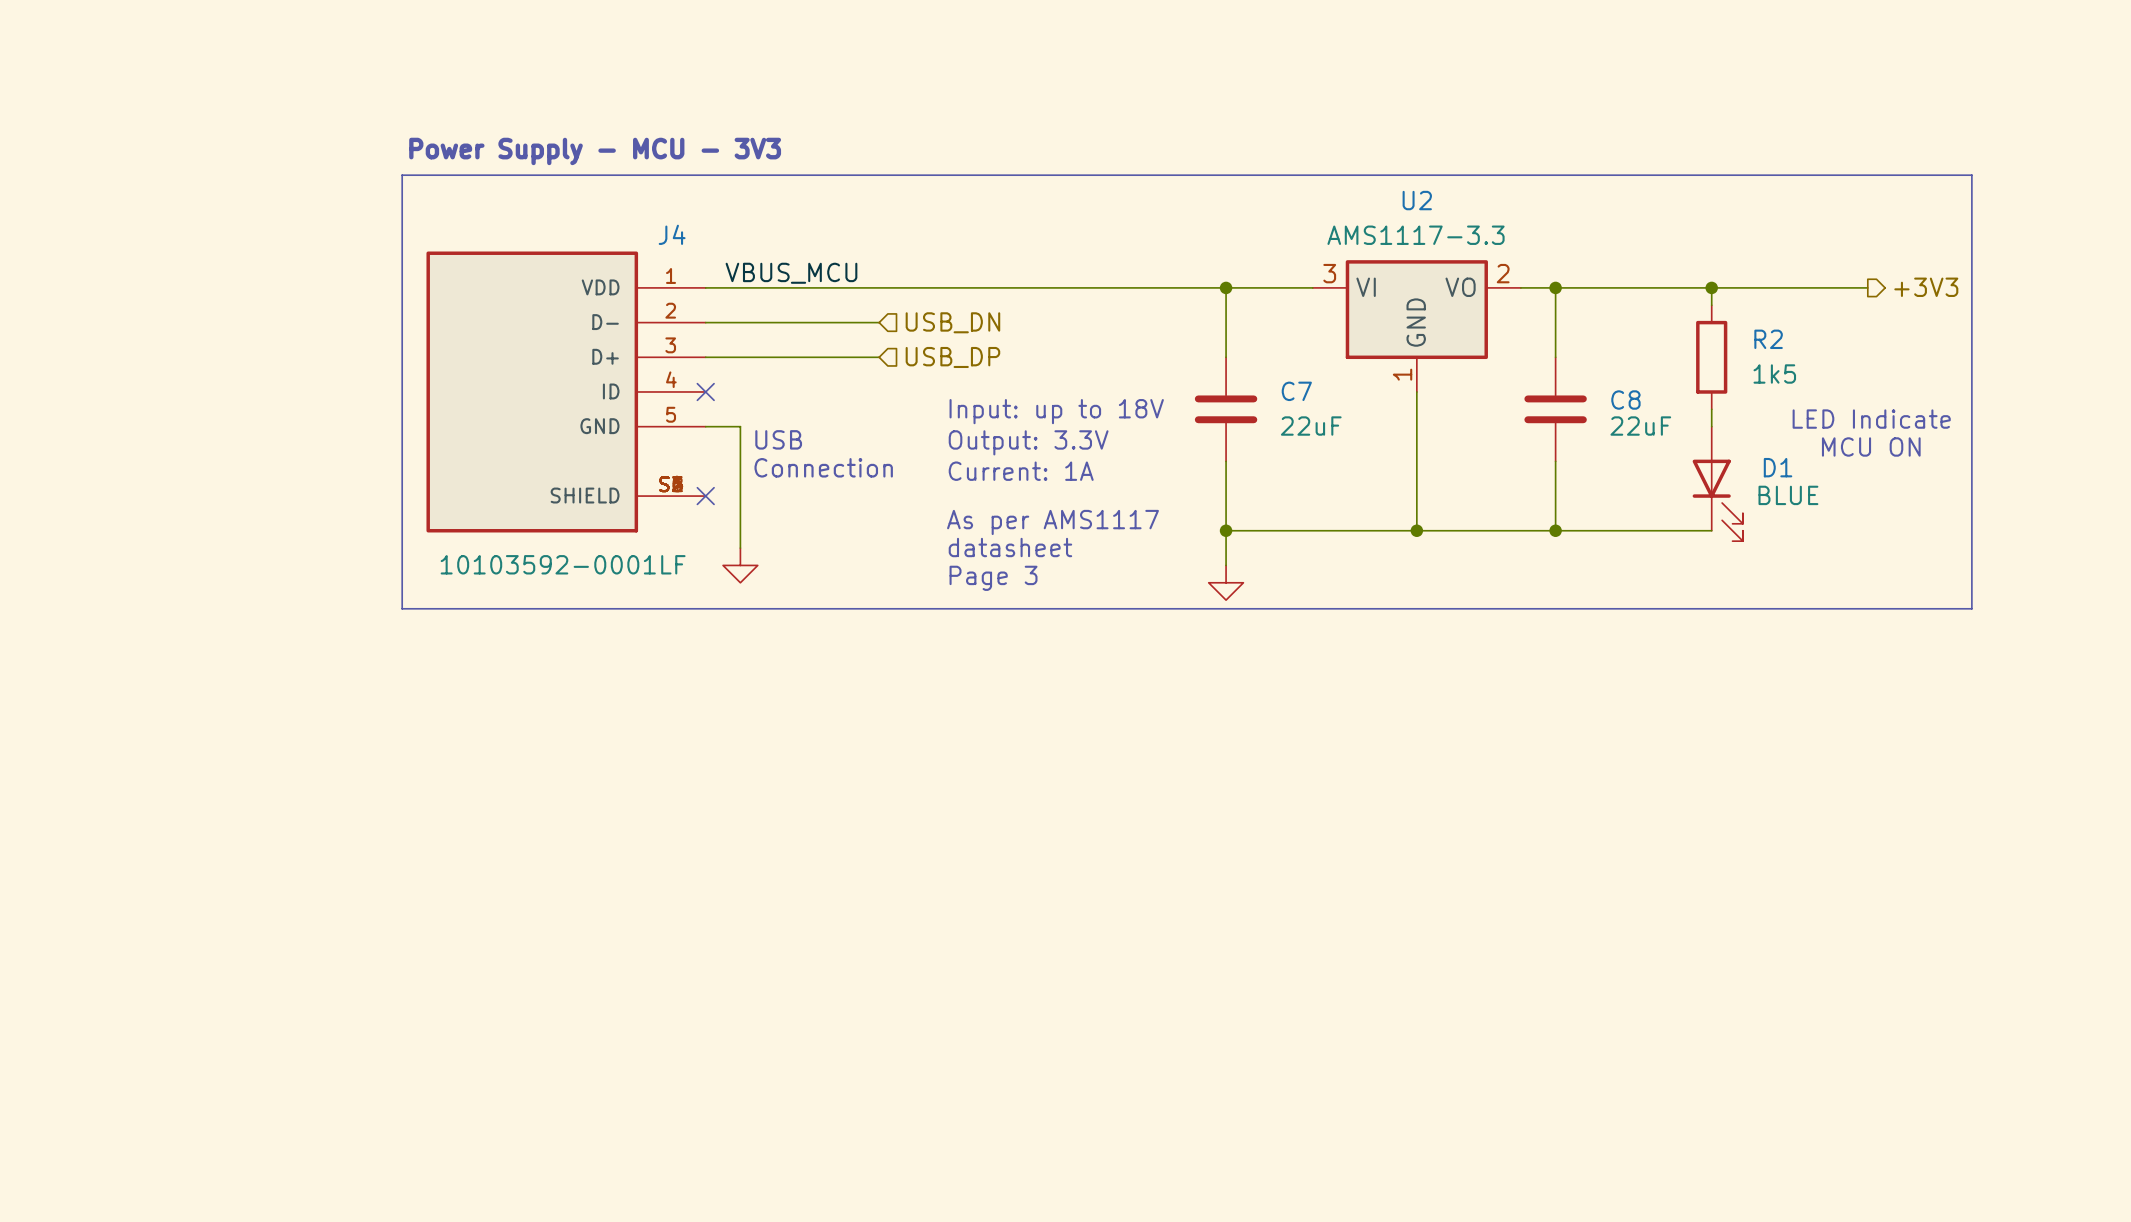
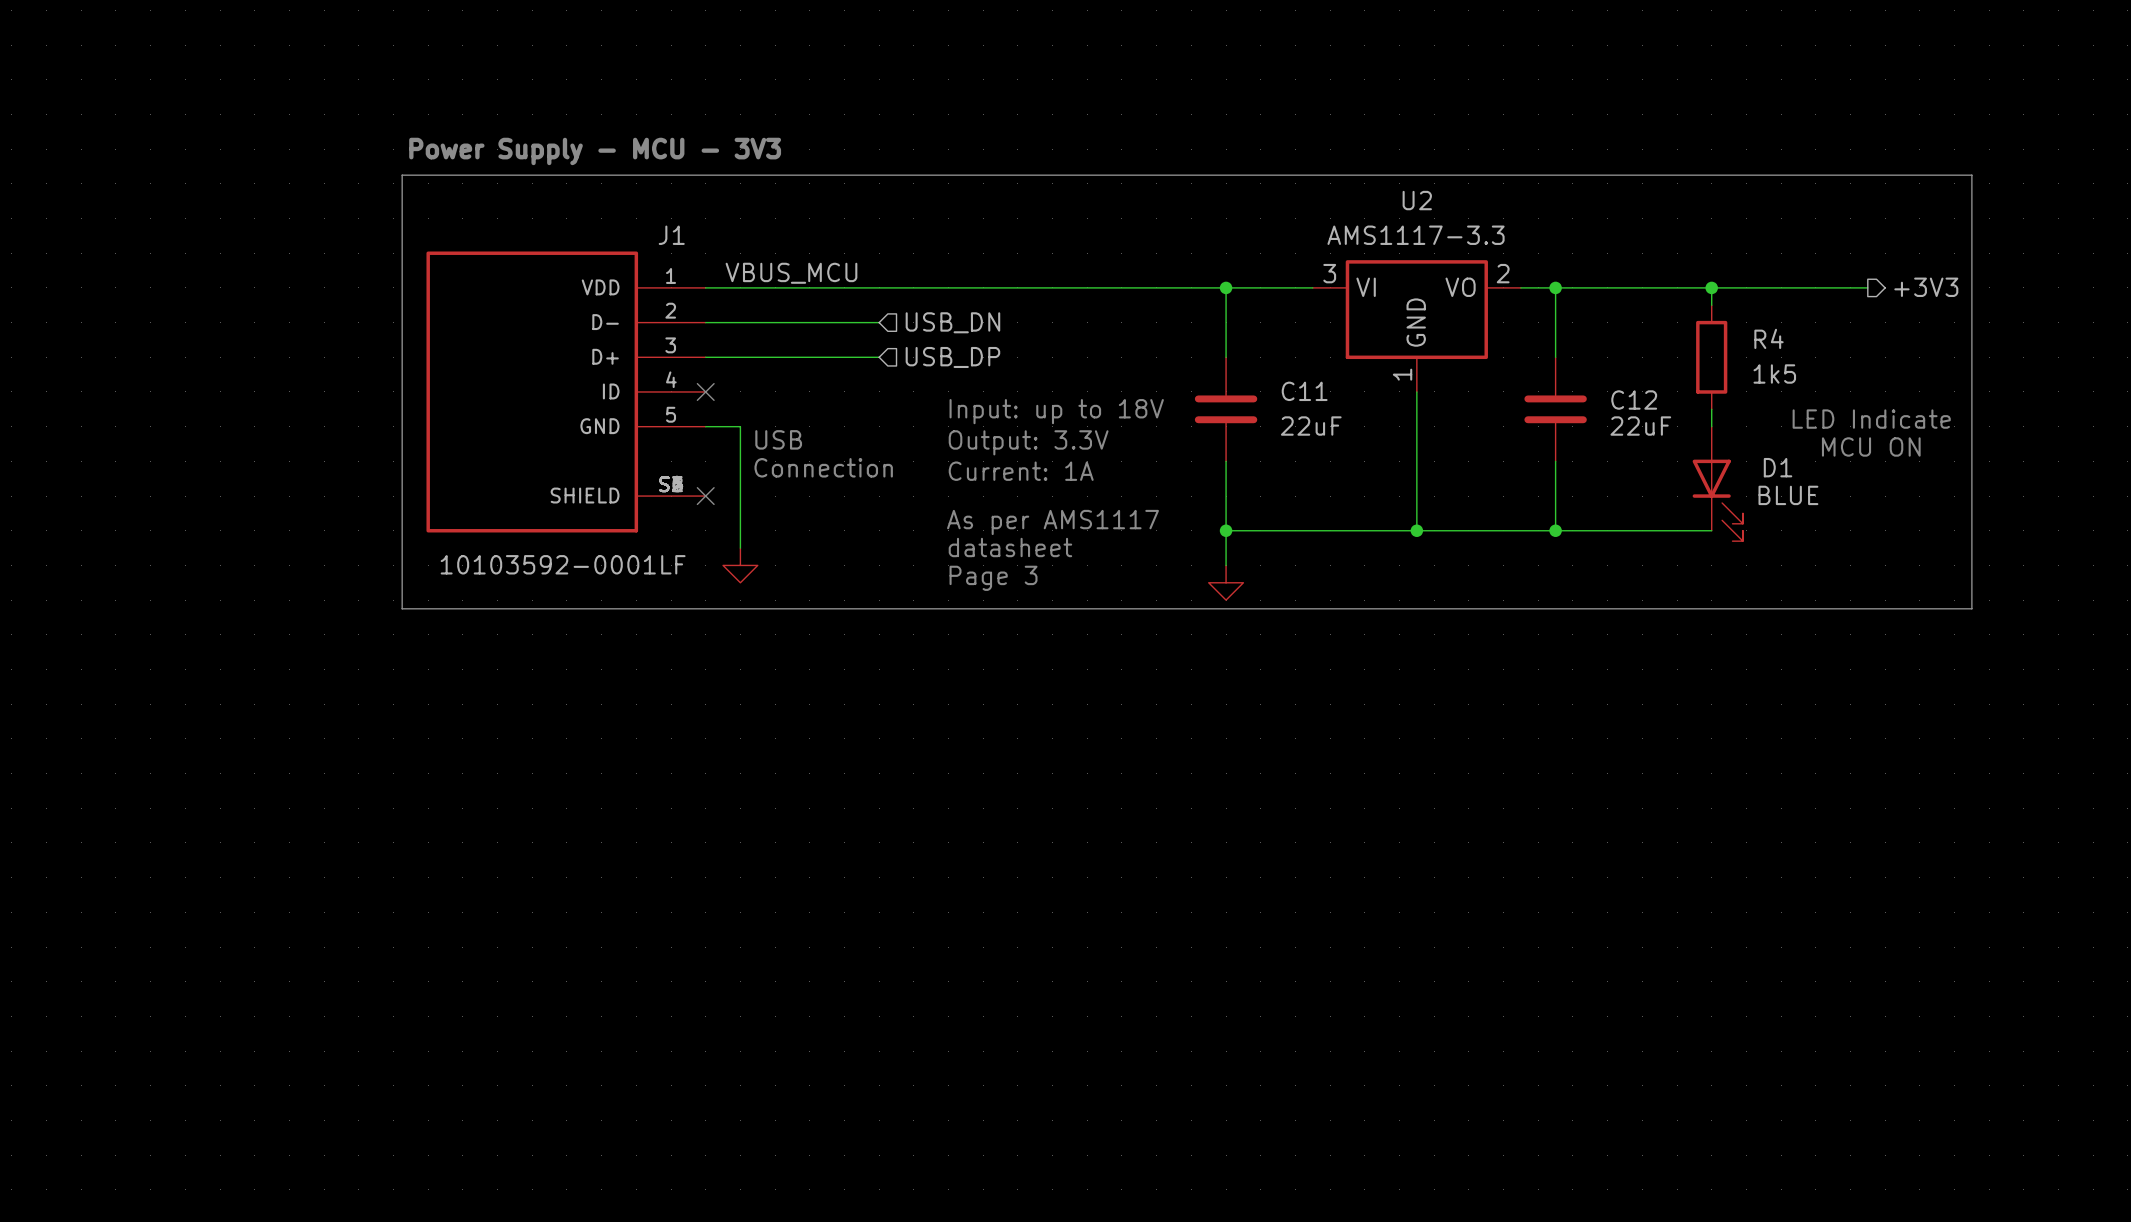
J4 name: J4 (672, 234) -> J1 (671, 235)
R2 name: R2 (1768, 339) -> R4 (1768, 338)
C7 name: C7 (1296, 391) -> C11 (1304, 391)
C8 name: C8 (1625, 400) -> C12 (1634, 400)

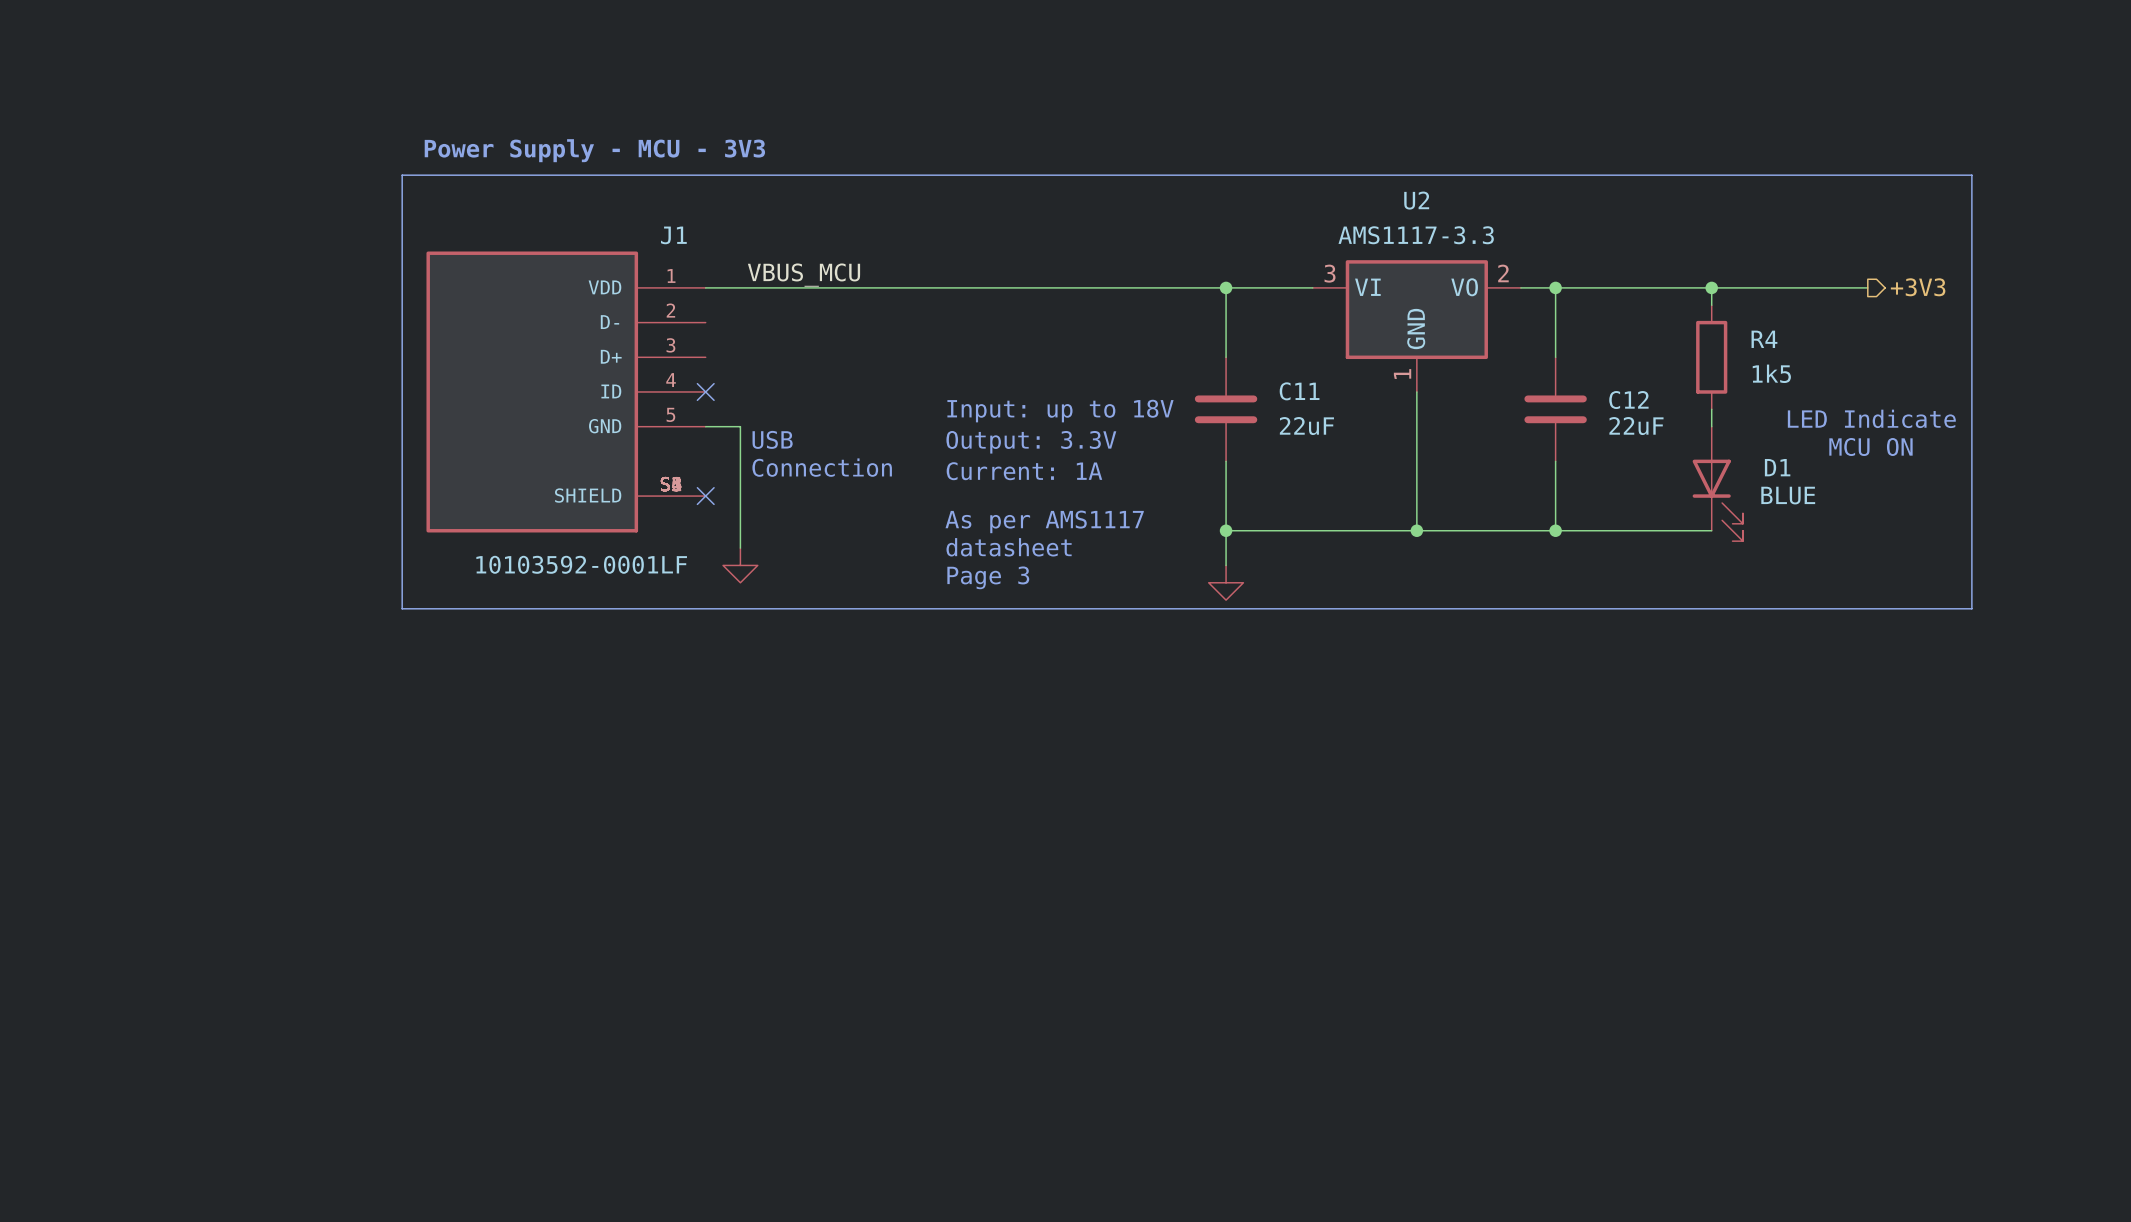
wire: (705, 322) (879, 322) -> none
hierarchical label: USB_DN (952, 322) -> none
wire: (705, 357) (879, 357) -> none
hierarchical label: USB_DP (952, 357) -> none

